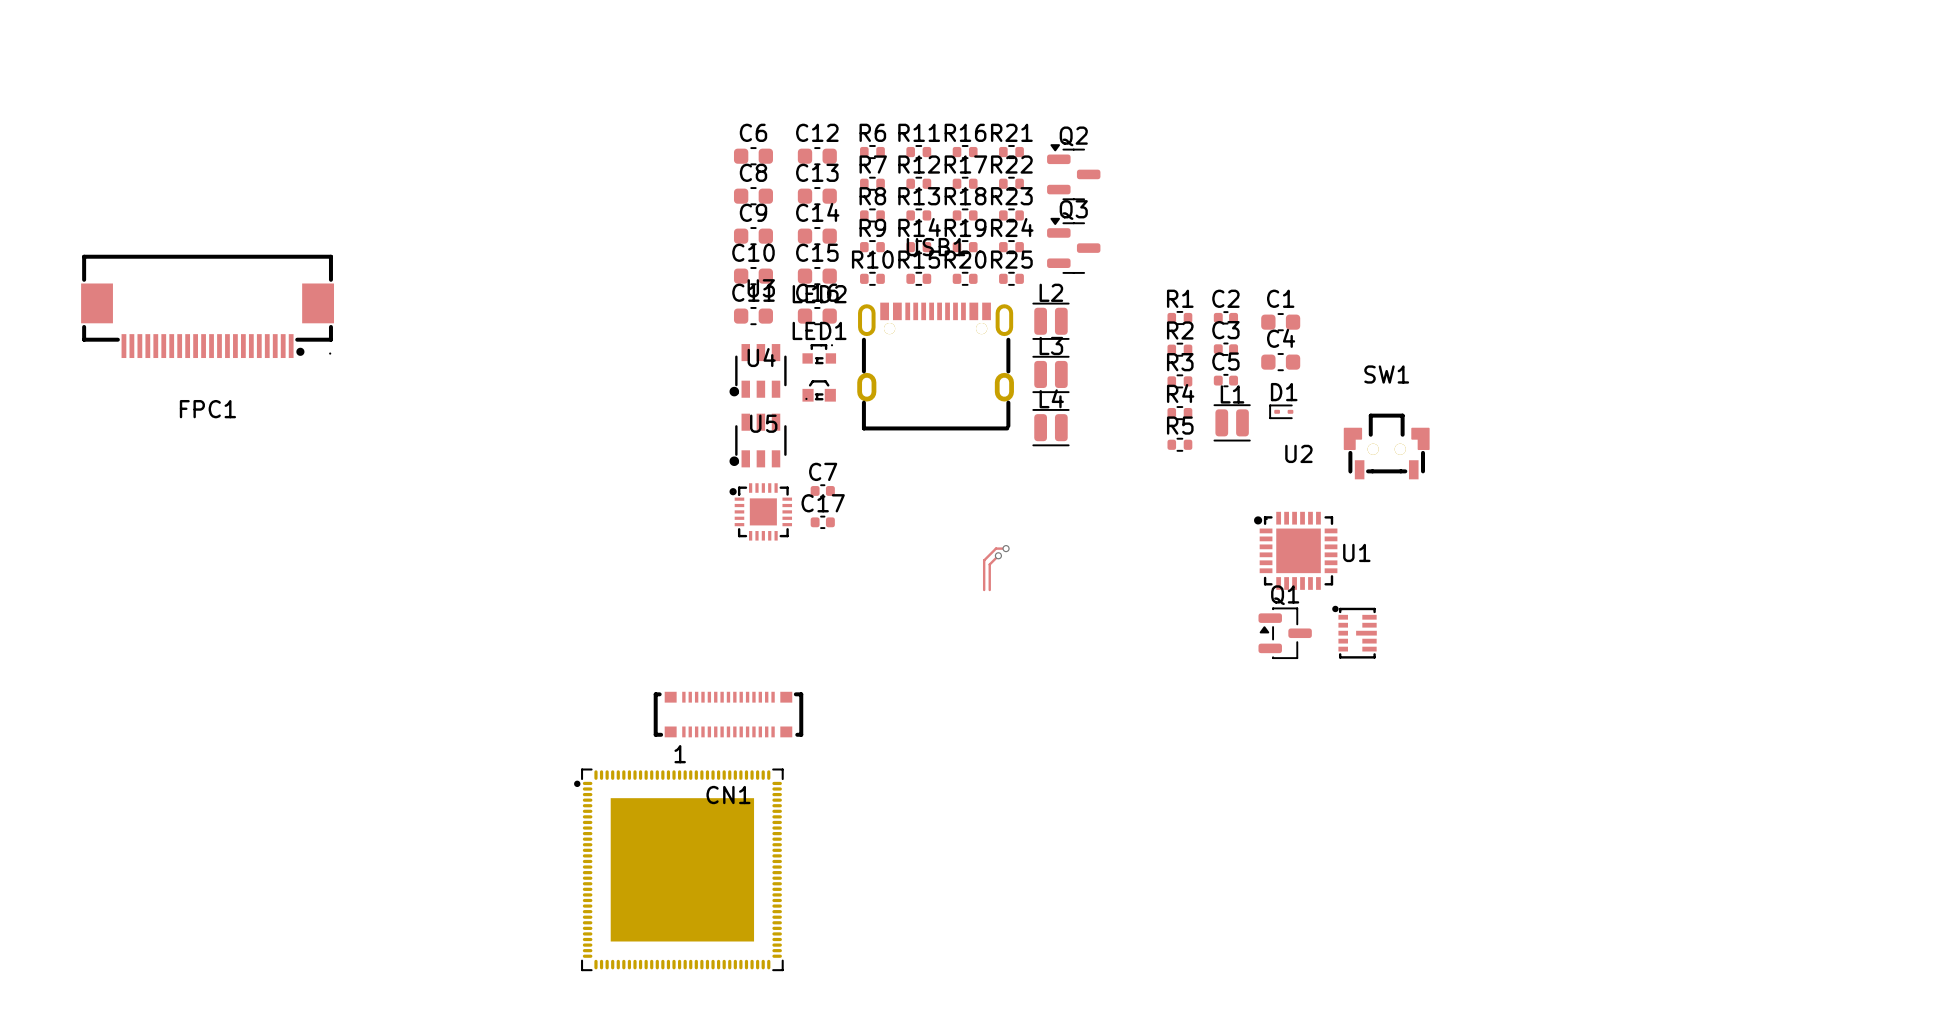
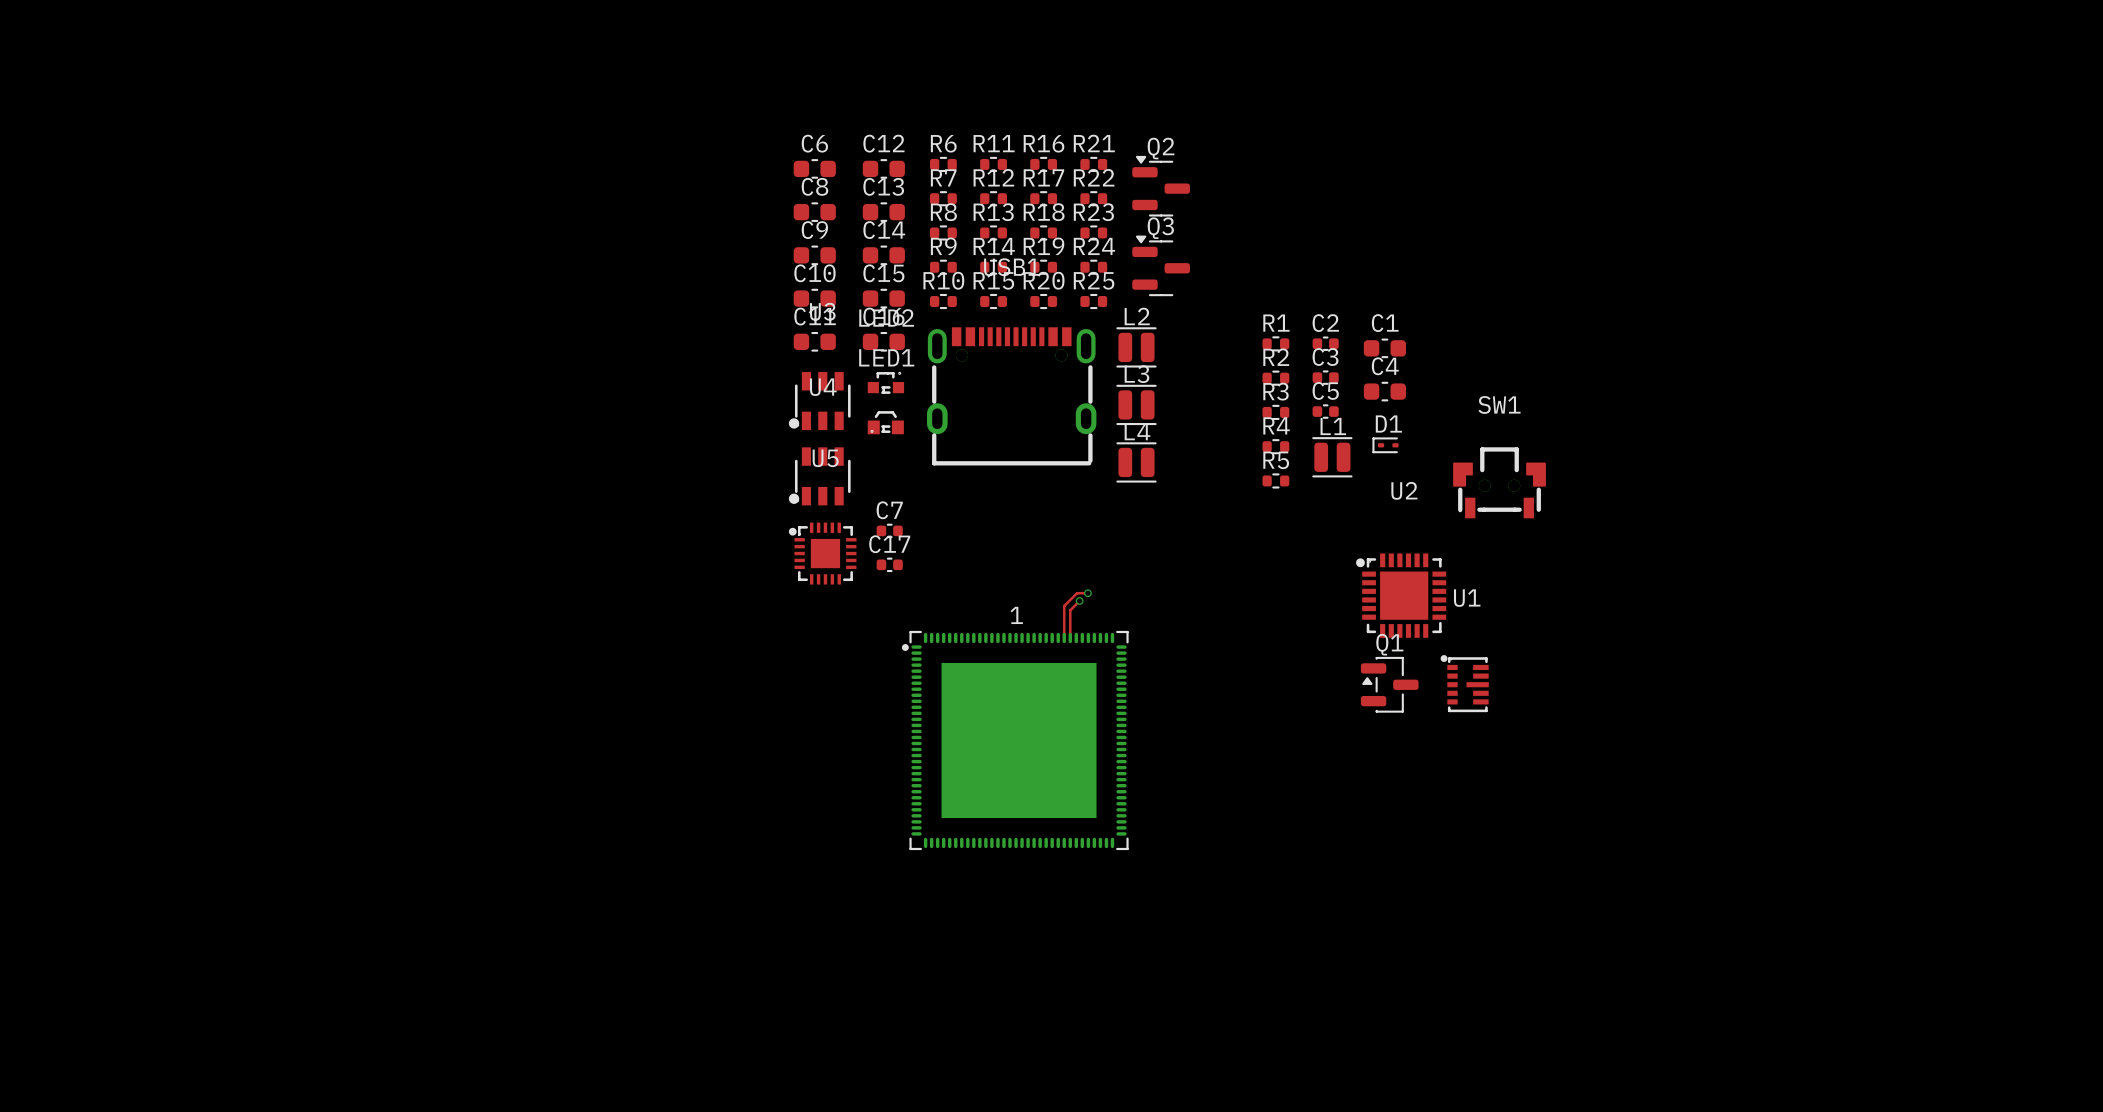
FPC1: (207, 306) -> none
CN1: (728, 714) -> none
1 position: (678, 869) -> (1015, 740)

